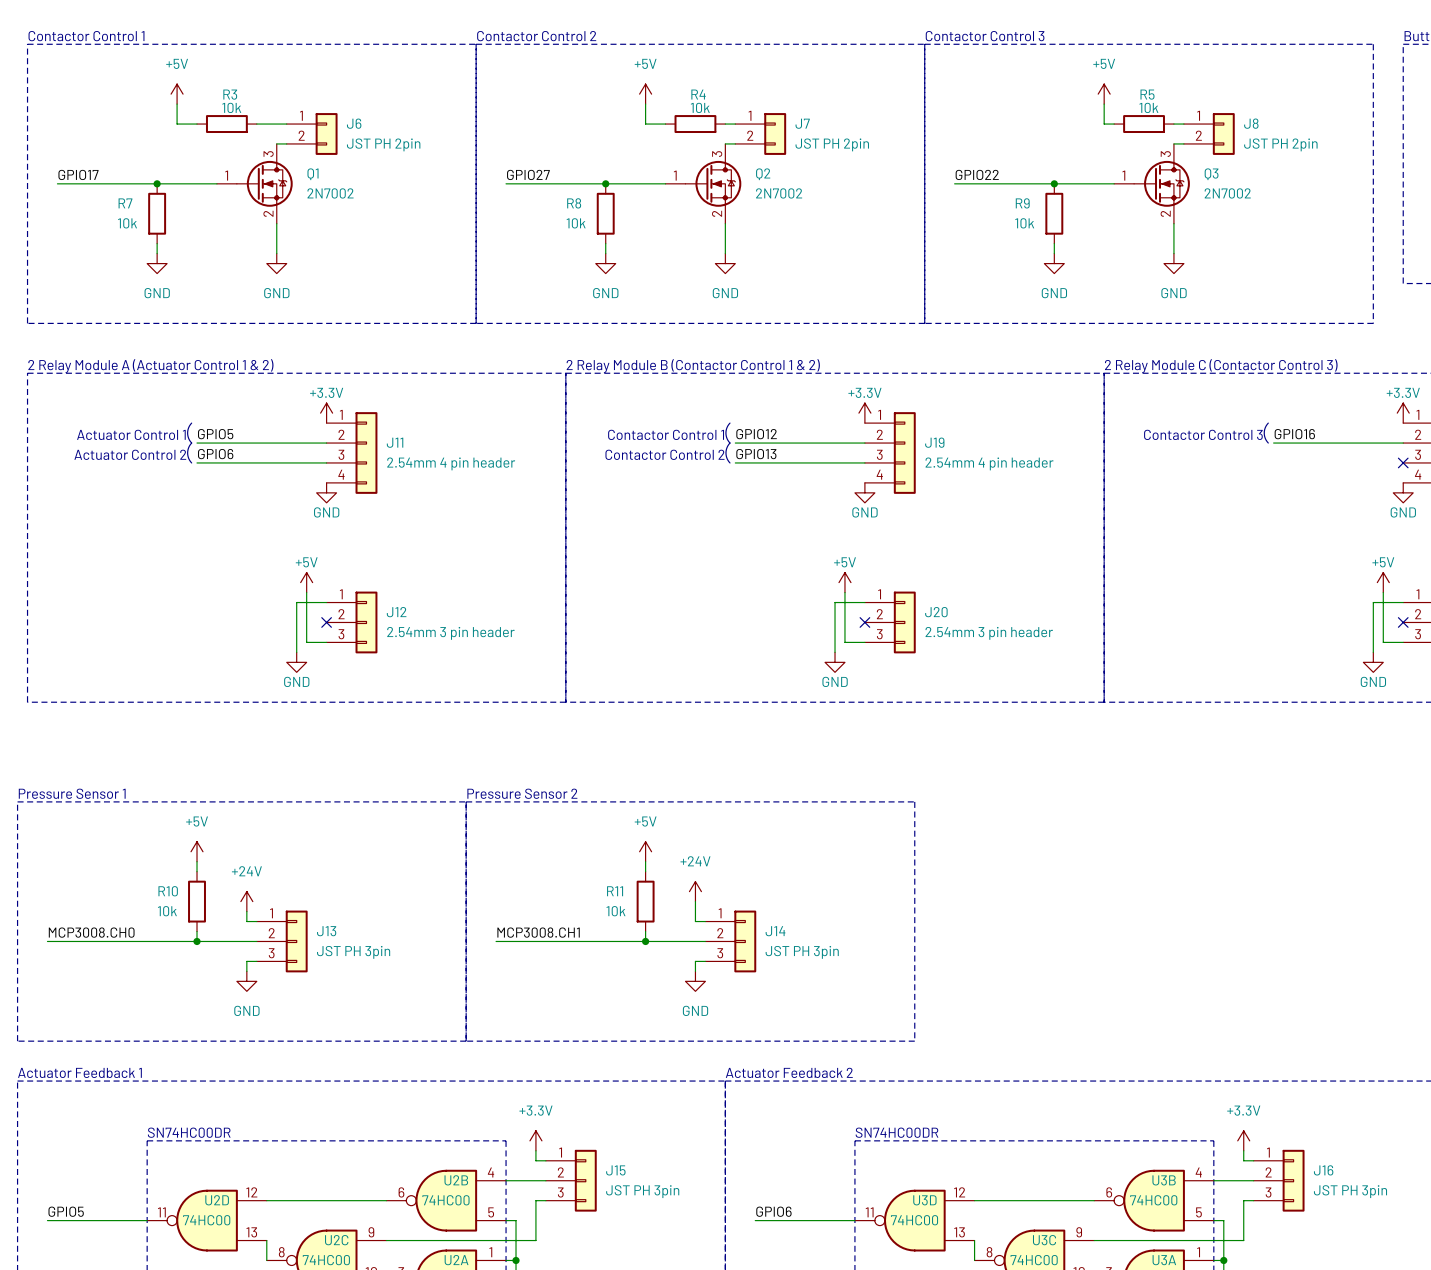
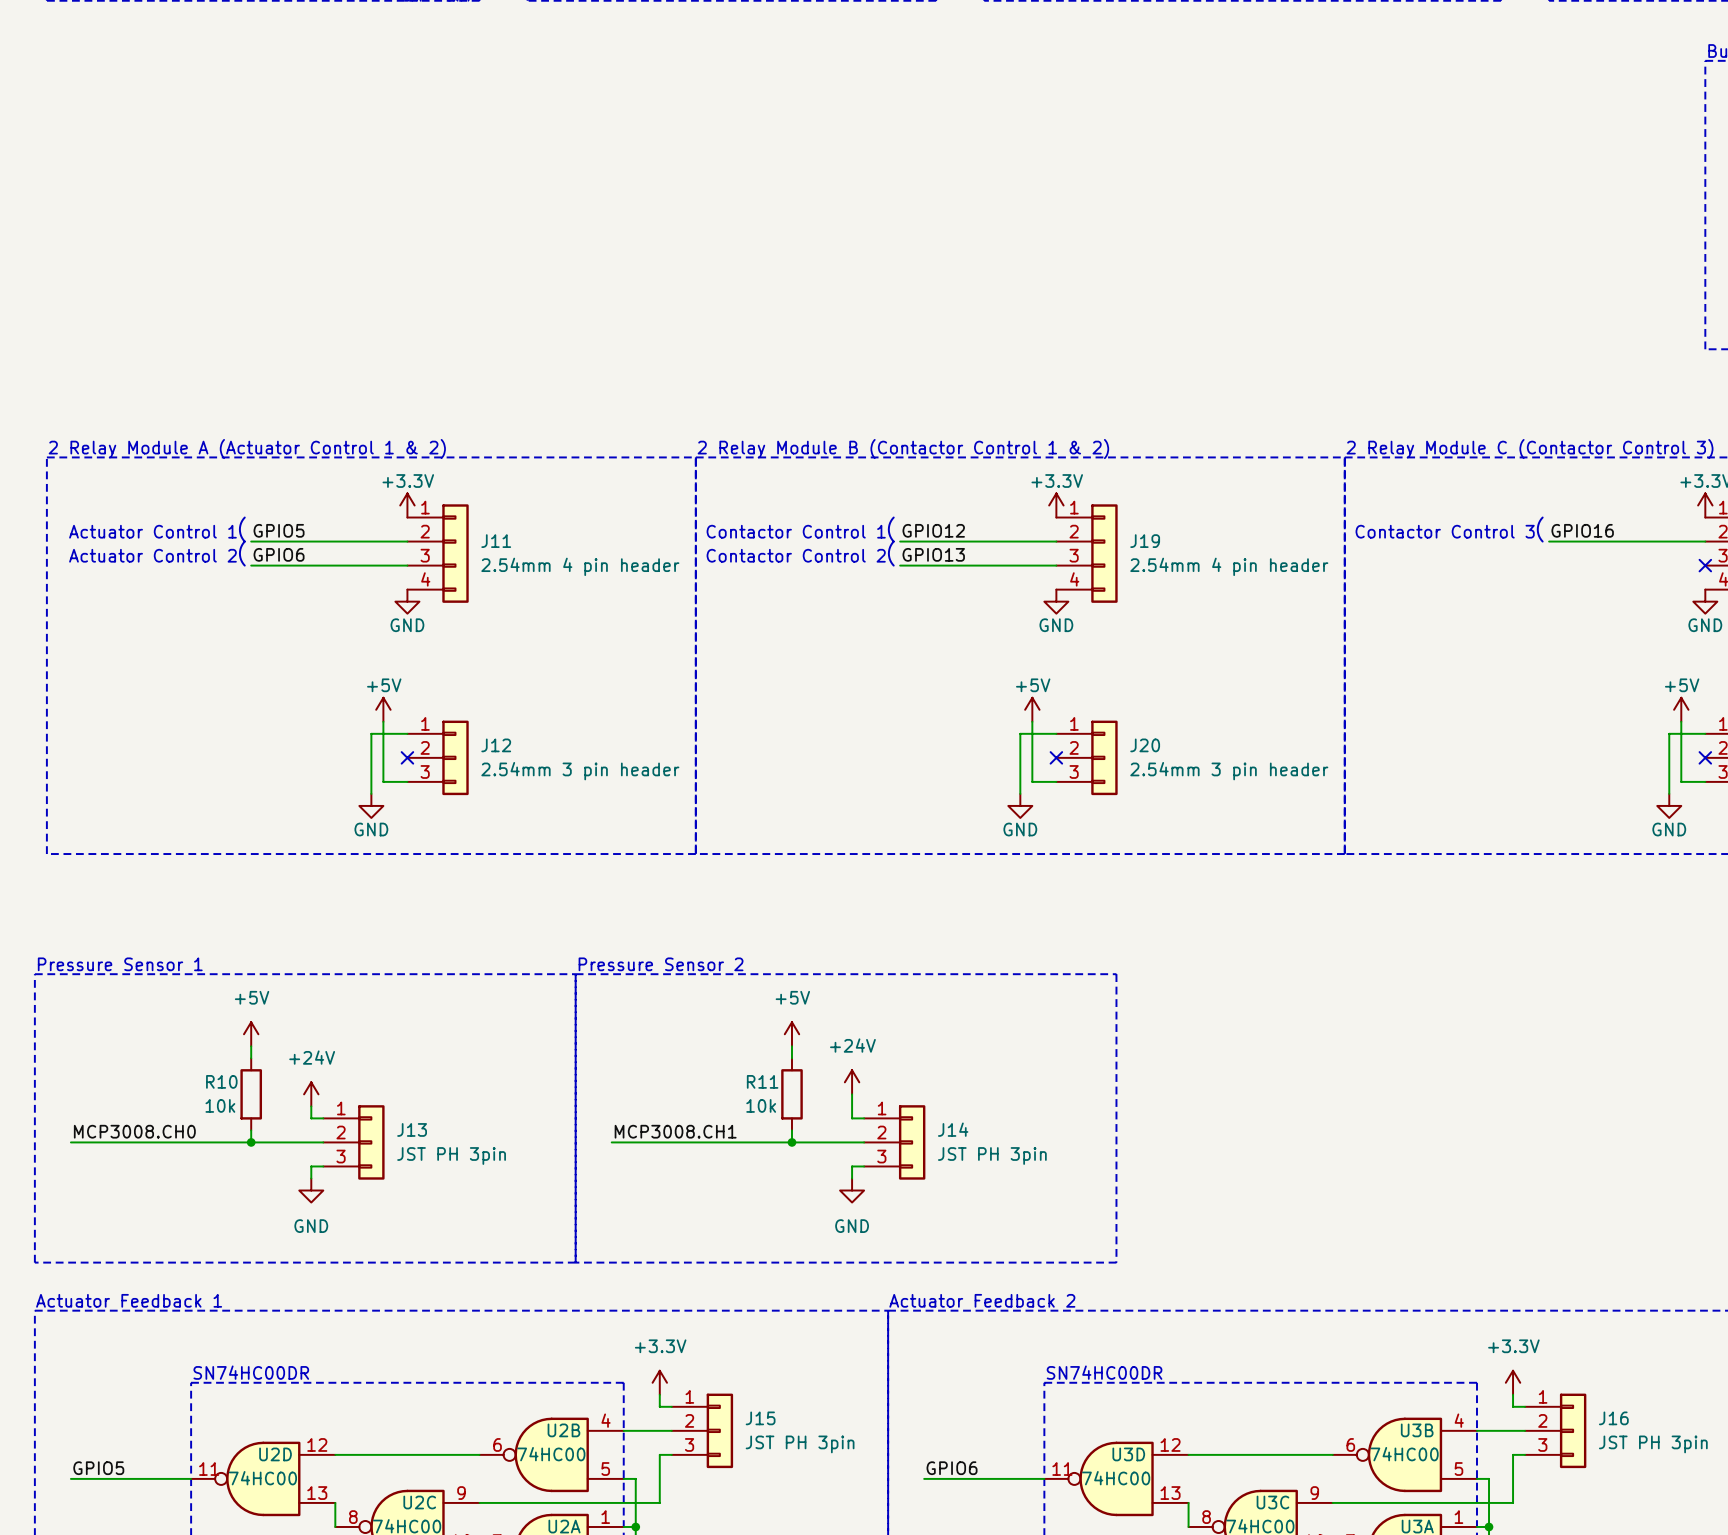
text: Contactor Control 1 (86, 36) -> none
text: Contactor Control 2 (536, 36) -> none
text: Contactor Control 3 (985, 36) -> none
line: (27, 44) (1373, 44) (1373, 323) (27, 323) (27, 44) -> none
line: (476, 44) (476, 323) -> none
line: (924, 44) (924, 323) -> none
power symbol: +5V (177, 94) -> none
power symbol: +5V (645, 94) -> none
power symbol: +5V (1104, 94) -> none
wire: (177, 104) (177, 124) (197, 124) -> none
wire: (645, 104) (645, 124) (665, 124) -> none
wire: (1104, 104) (1104, 124) (1114, 124) -> none
R3: 10k (226, 124) -> none
wire: (256, 124) (286, 124) -> none
R4: 10k (695, 124) -> none
wire: (725, 124) (735, 124) -> none
R5: 10k (1144, 124) -> none
wire: (1173, 124) (1183, 124) -> none
J6: JST PH 2pin (312, 134) -> none
J7: JST PH 2pin (760, 134) -> none
J8: JST PH 2pin (1209, 134) -> none
wire: (276, 143) (286, 143) -> none
wire: (725, 143) (735, 143) -> none
wire: (1173, 143) (1183, 143) -> none
label: GPIO17 (78, 174) -> none
label: GPIO27 (528, 174) -> none
label: GPIO22 (977, 174) -> none
wire: (57, 183) (216, 183) -> none
junction: (157, 183) -> none
Q1: 2N7002 (254, 183) -> none
wire: (506, 183) (665, 183) -> none
junction: (605, 183) -> none
Q2: 2N7002 (703, 183) -> none
wire: (954, 183) (1114, 183) -> none
junction: (1054, 183) -> none
Q3: 2N7002 (1152, 183) -> none
R7: 10k (157, 213) -> none
R8: 10k (605, 213) -> none
R9: 10k (1054, 213) -> none
wire: (276, 223) (276, 253) -> none
wire: (725, 223) (725, 253) -> none
wire: (1173, 223) (1173, 253) -> none
wire: (157, 243) (157, 253) -> none
wire: (605, 243) (605, 253) -> none
wire: (1054, 243) (1054, 253) -> none
power symbol: GND (157, 263) -> none
power symbol: GND (276, 263) -> none
power symbol: GND (605, 263) -> none
power symbol: GND (725, 263) -> none
power symbol: GND (1054, 263) -> none
power symbol: GND (1173, 263) -> none

